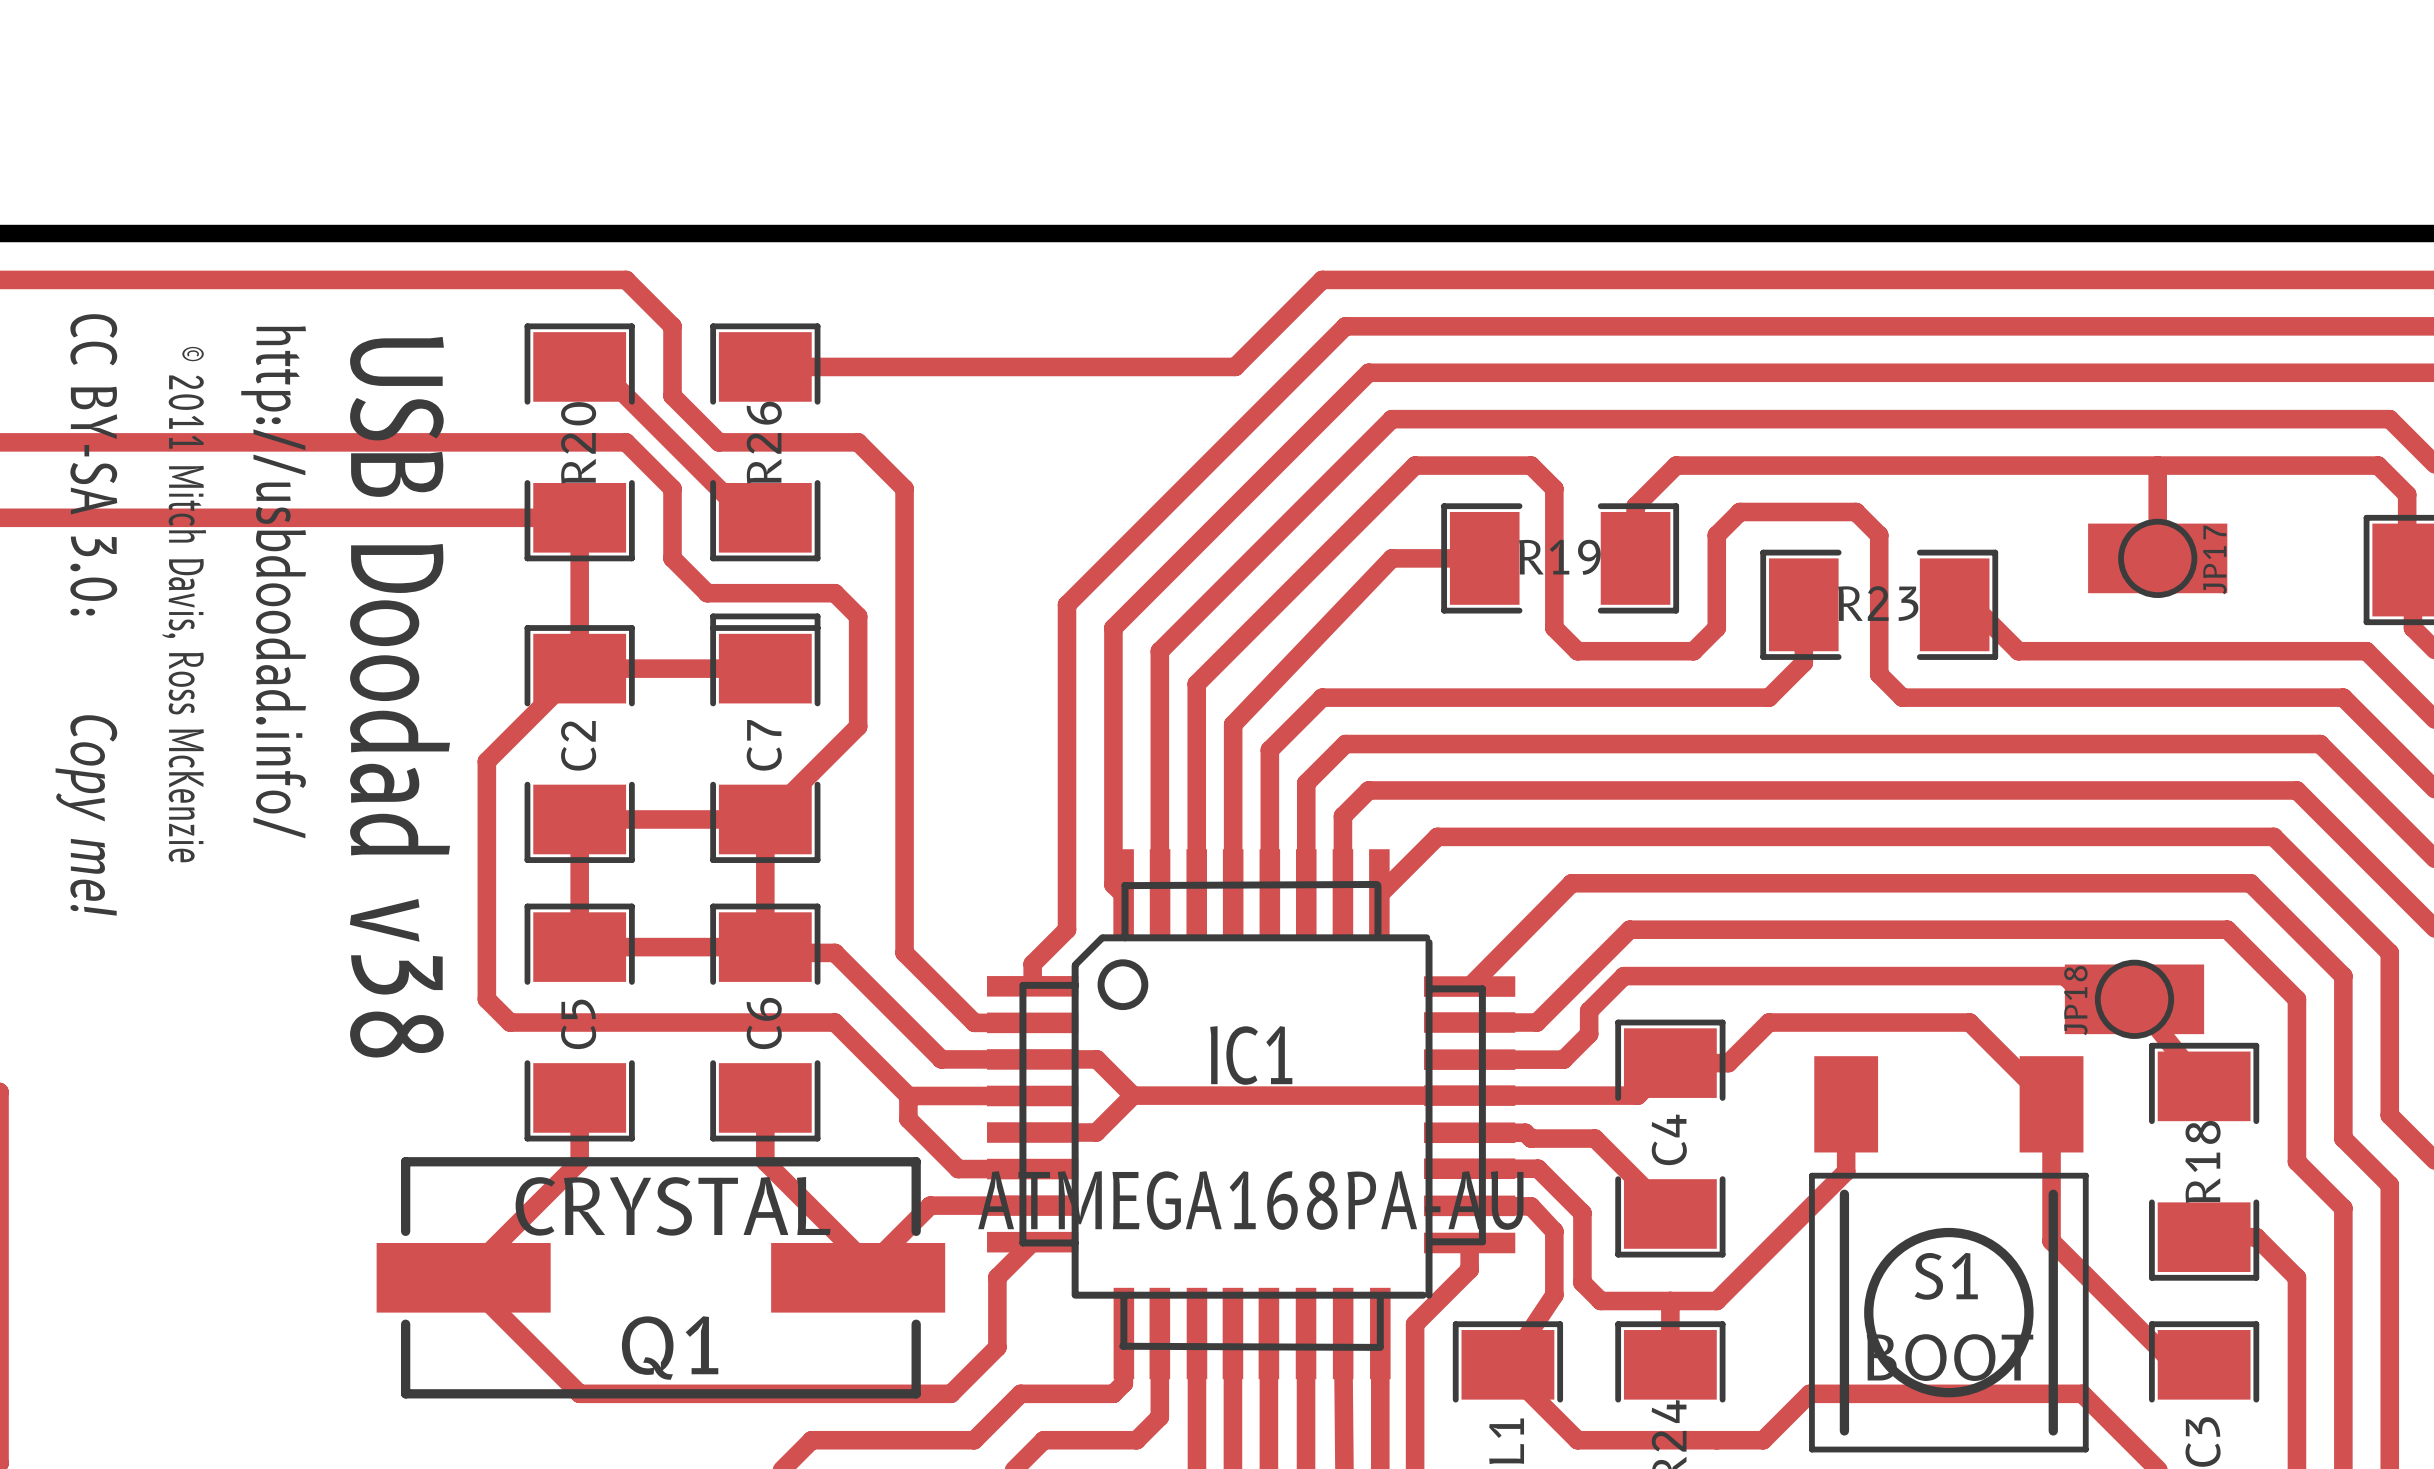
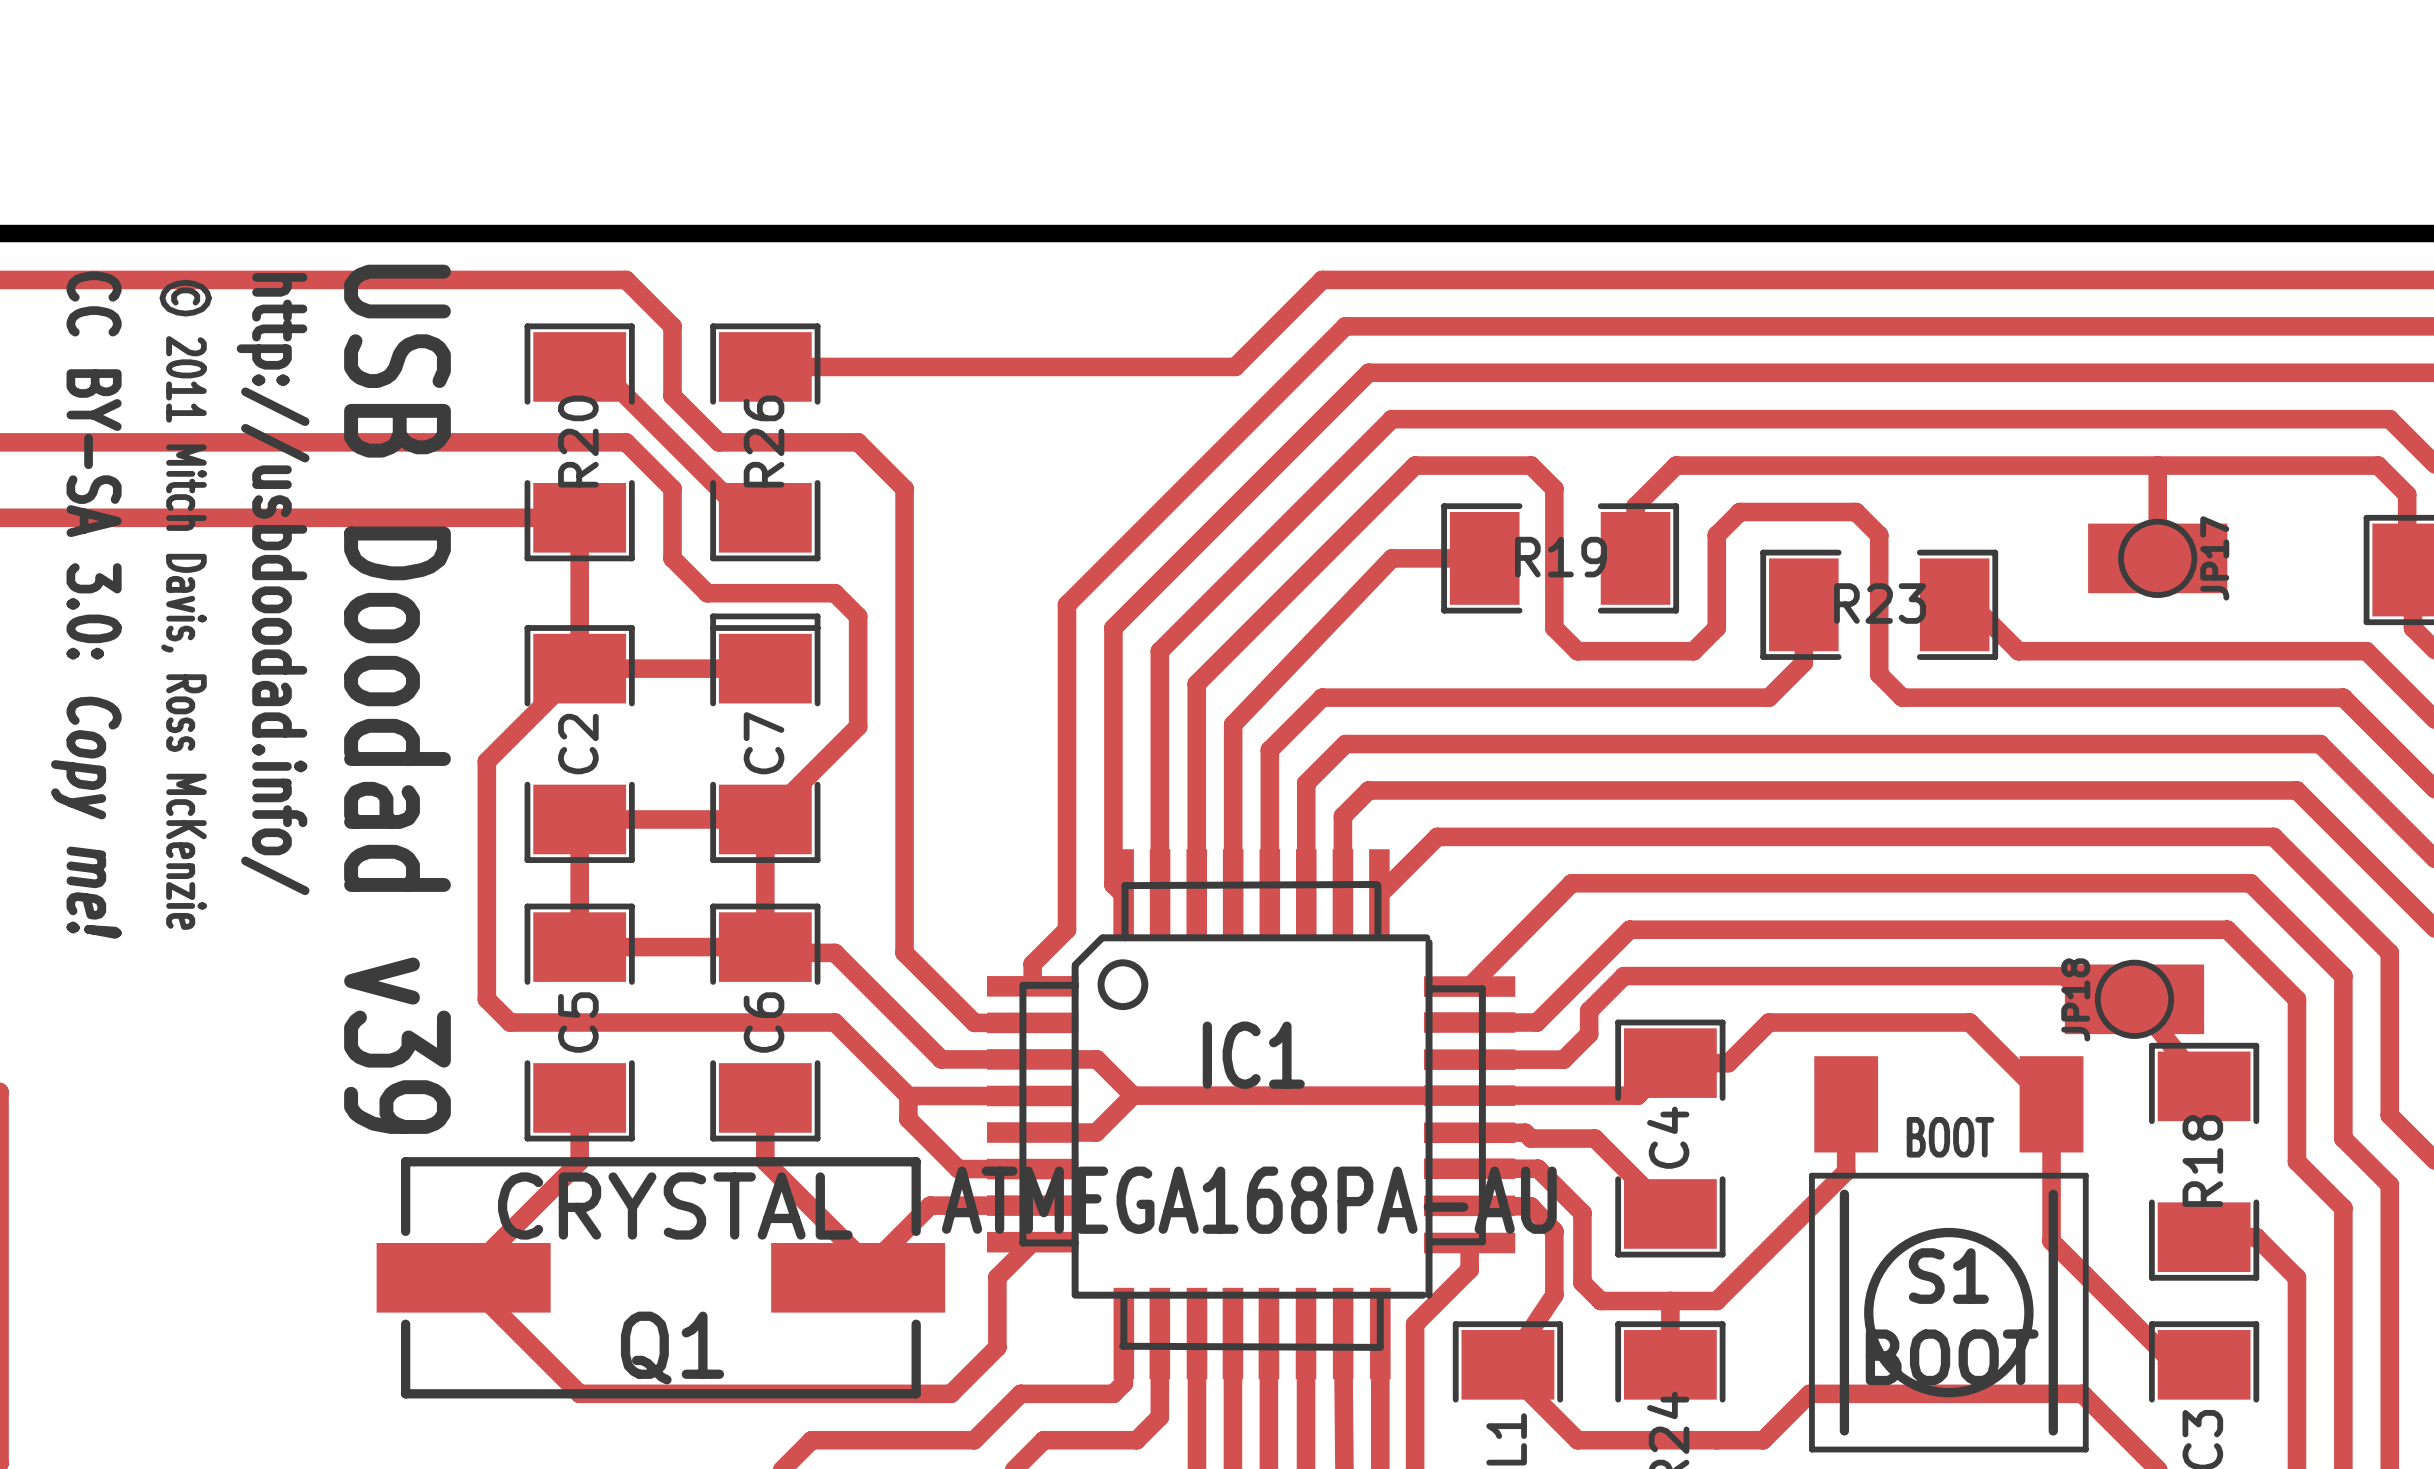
text: USB Doodad v38 (399, 697) -> USB Doodad v39 (397, 699)
text: none -> BOOT (1950, 1137)

